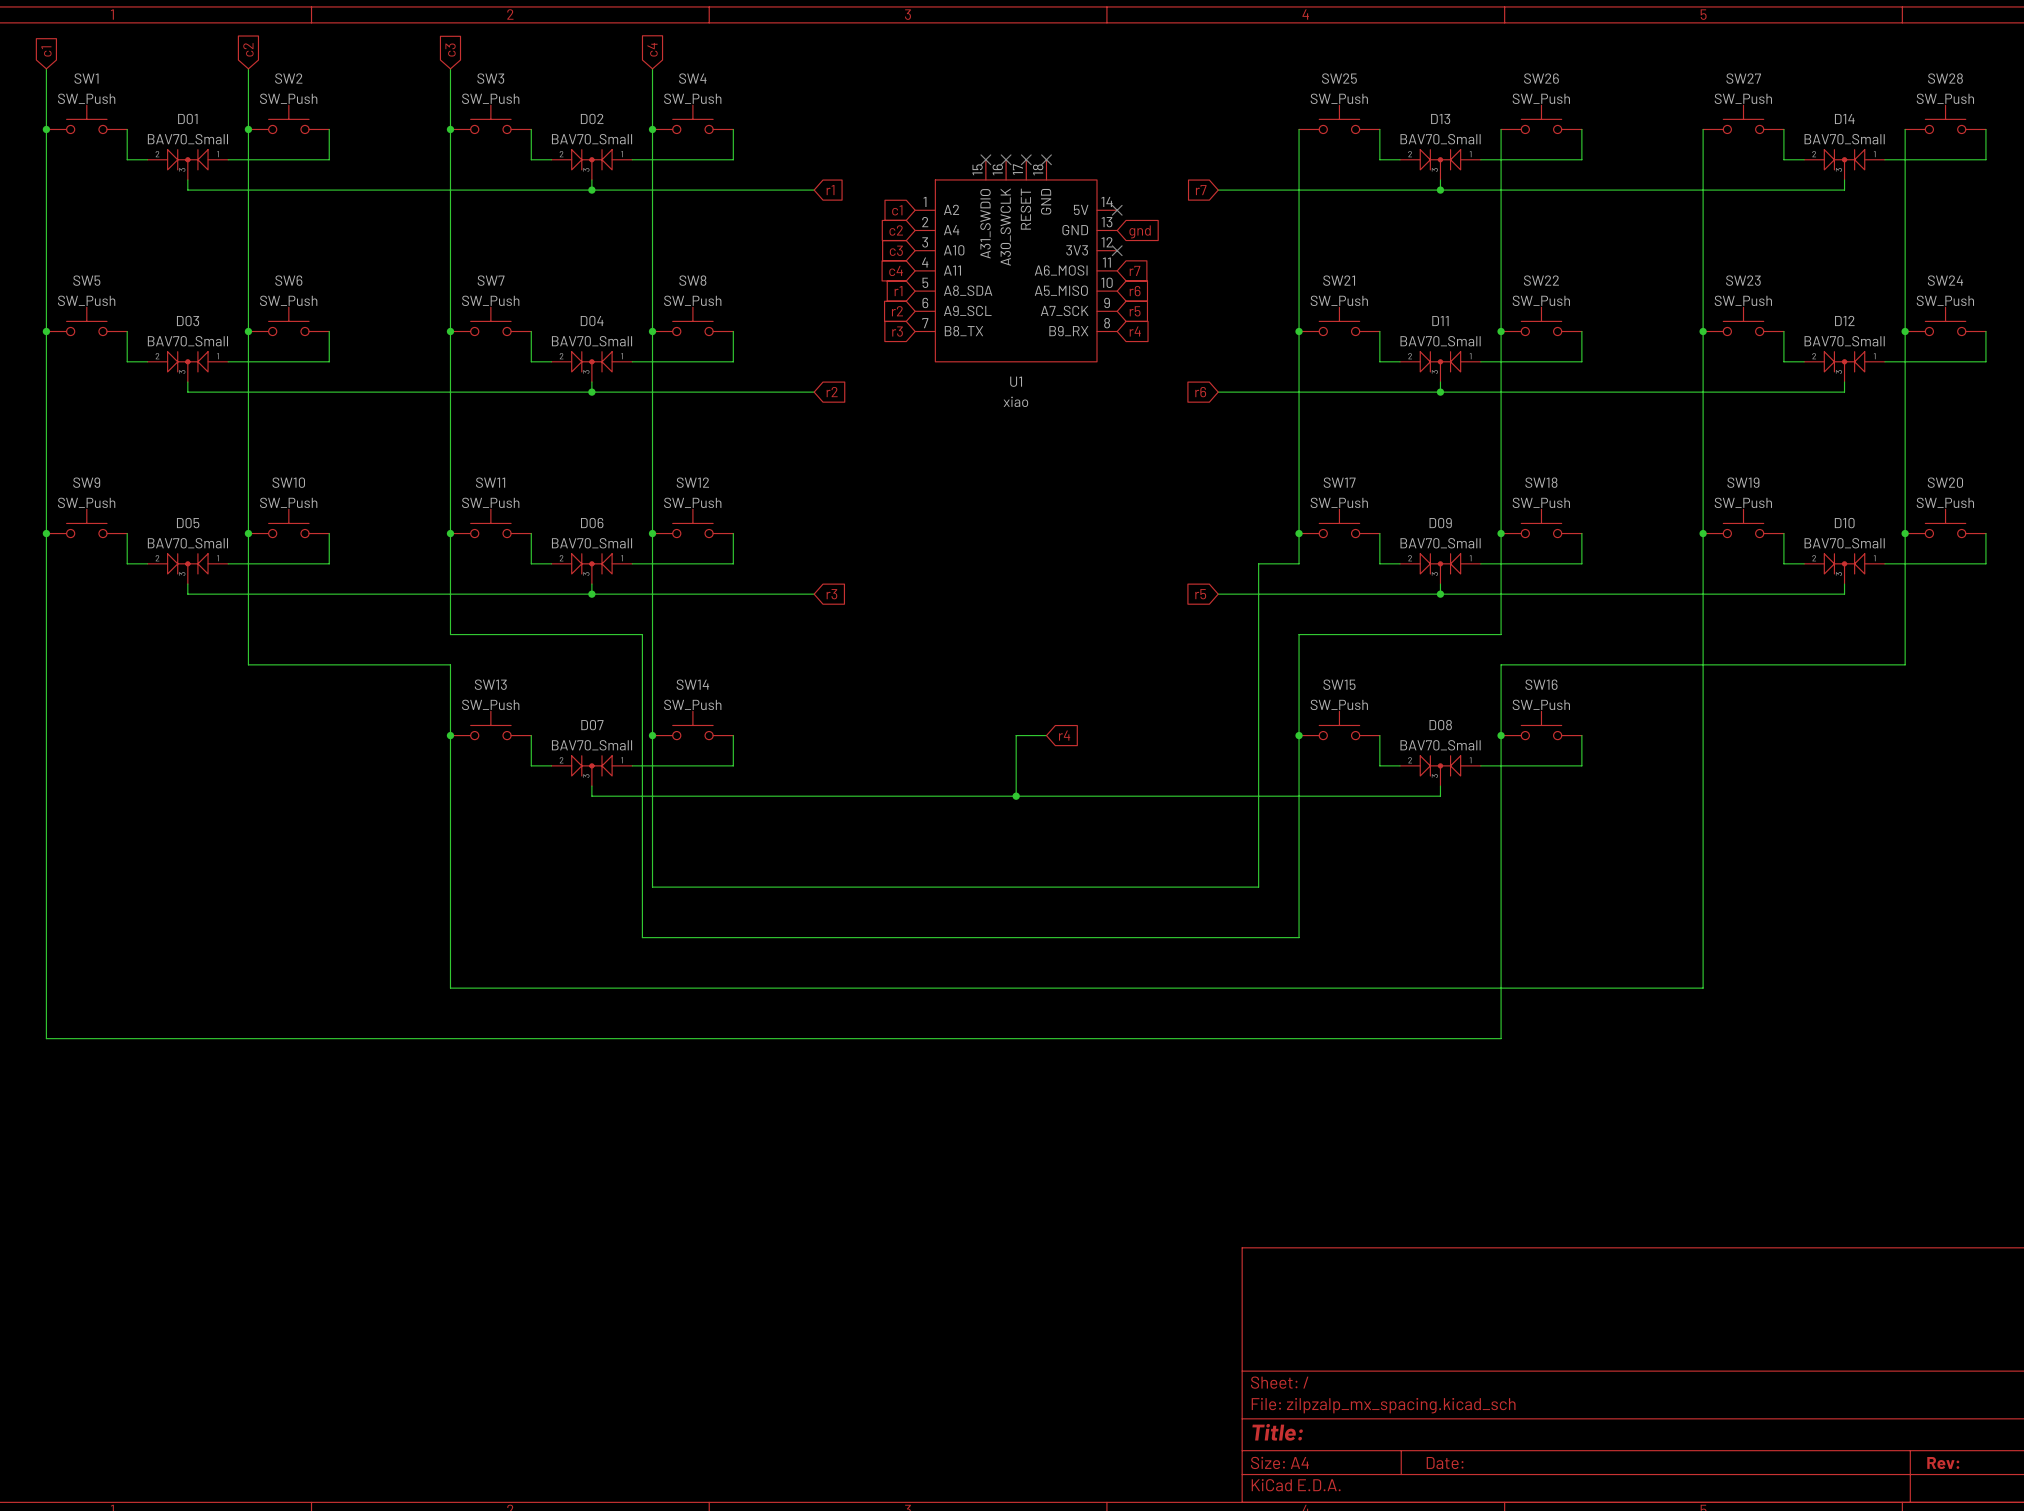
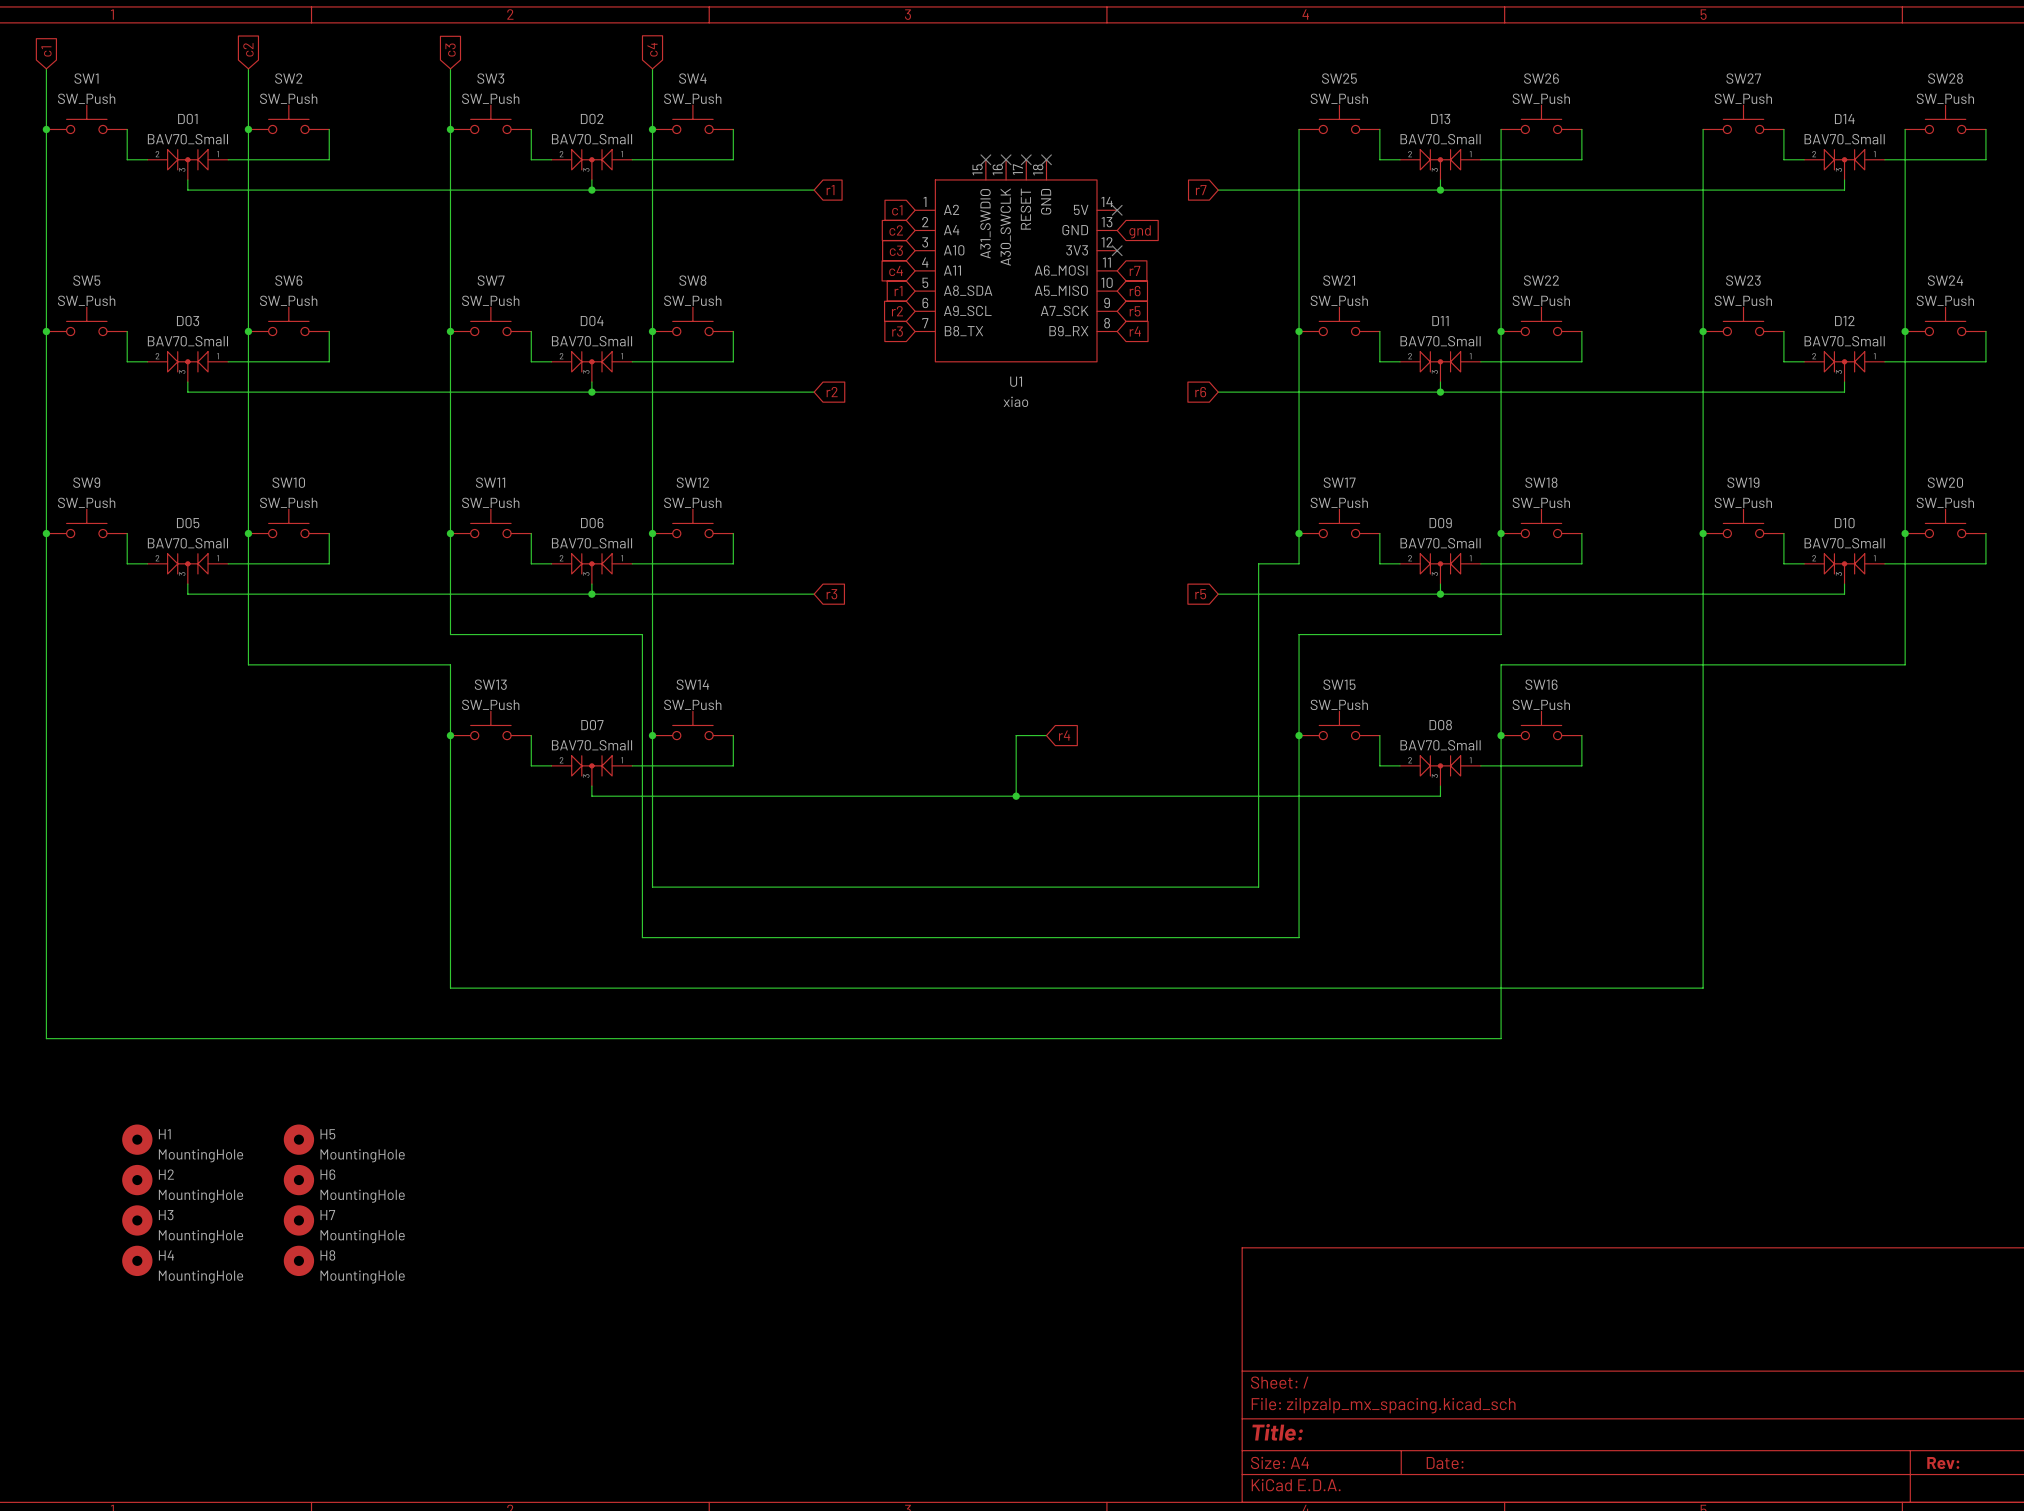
H1: none -> MountingHole (137, 1139)
H5: none -> MountingHole (298, 1139)
H2: none -> MountingHole (137, 1180)
H6: none -> MountingHole (298, 1180)
H3: none -> MountingHole (137, 1220)
H7: none -> MountingHole (298, 1220)
H4: none -> MountingHole (137, 1260)
H8: none -> MountingHole (298, 1260)

